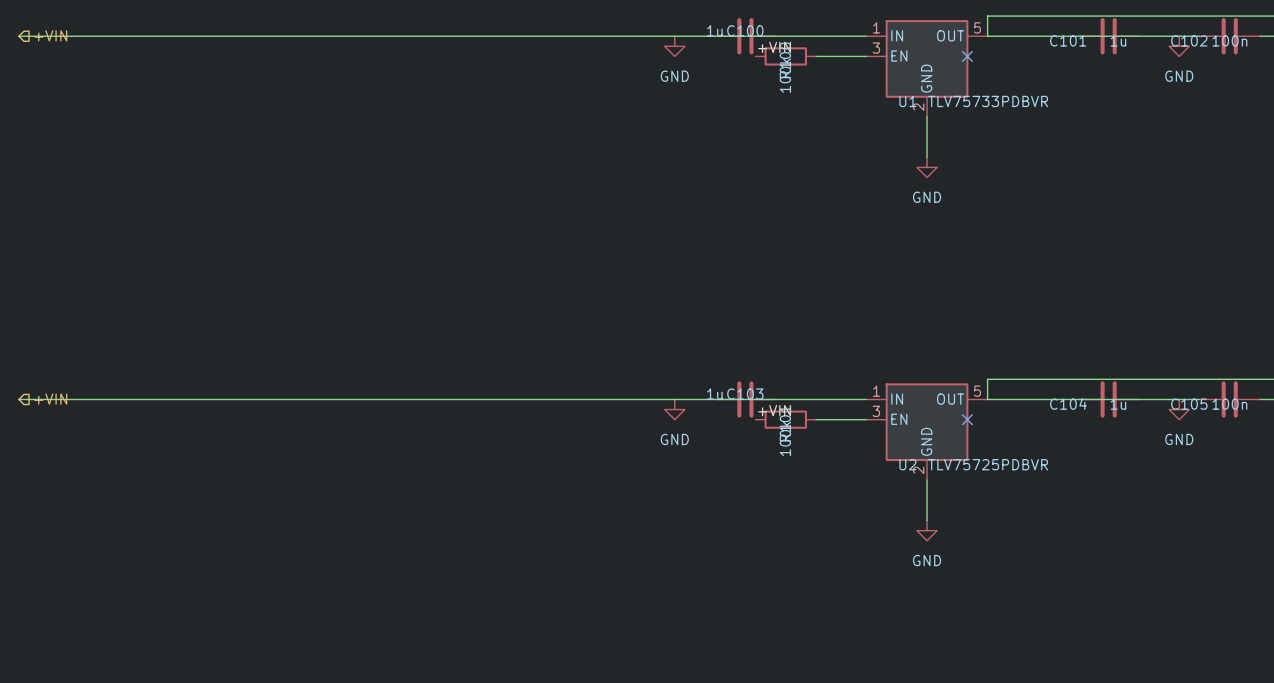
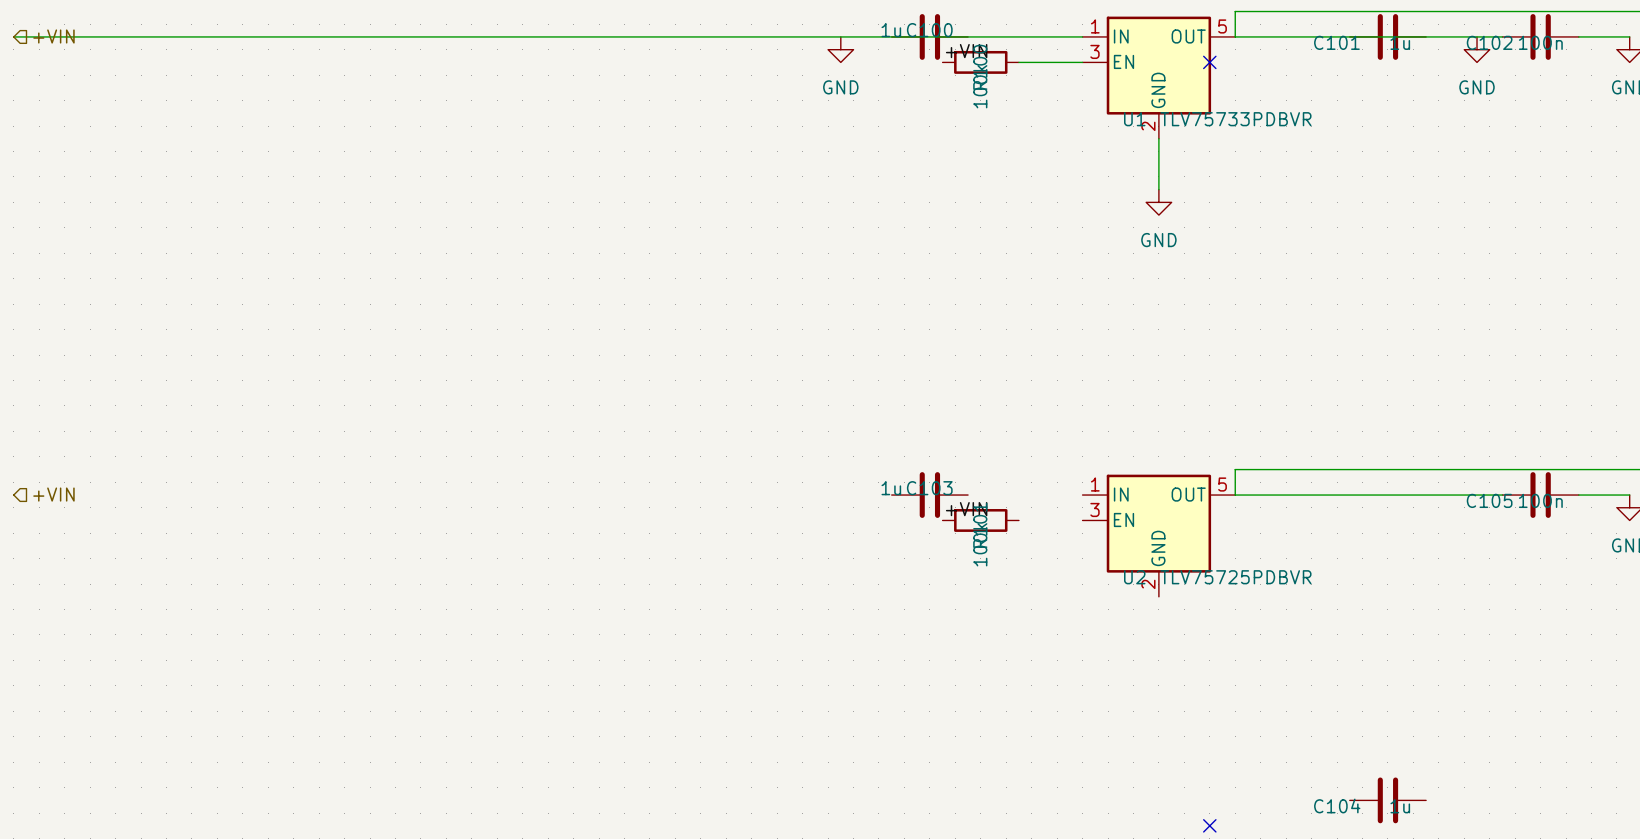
wire: (18, 399) (866, 399) -> none
C104 position: (1108, 399) -> (1387, 800)
power symbol: GND (674, 409) -> none
power symbol: GND (1179, 409) -> none
wire: (816, 419) (866, 419) -> none
no-connect mark: (967, 419) -> none
wire: (927, 480) (927, 520) -> none
power symbol: GND (927, 530) -> none
no-connect mark: none -> (1209, 825)

